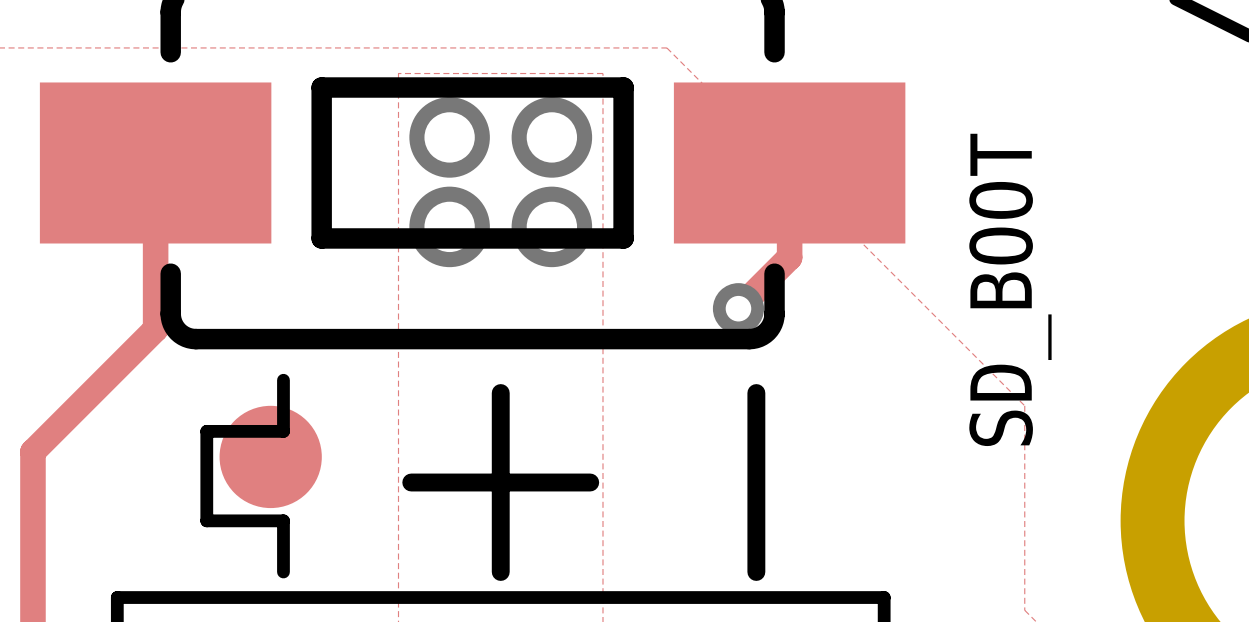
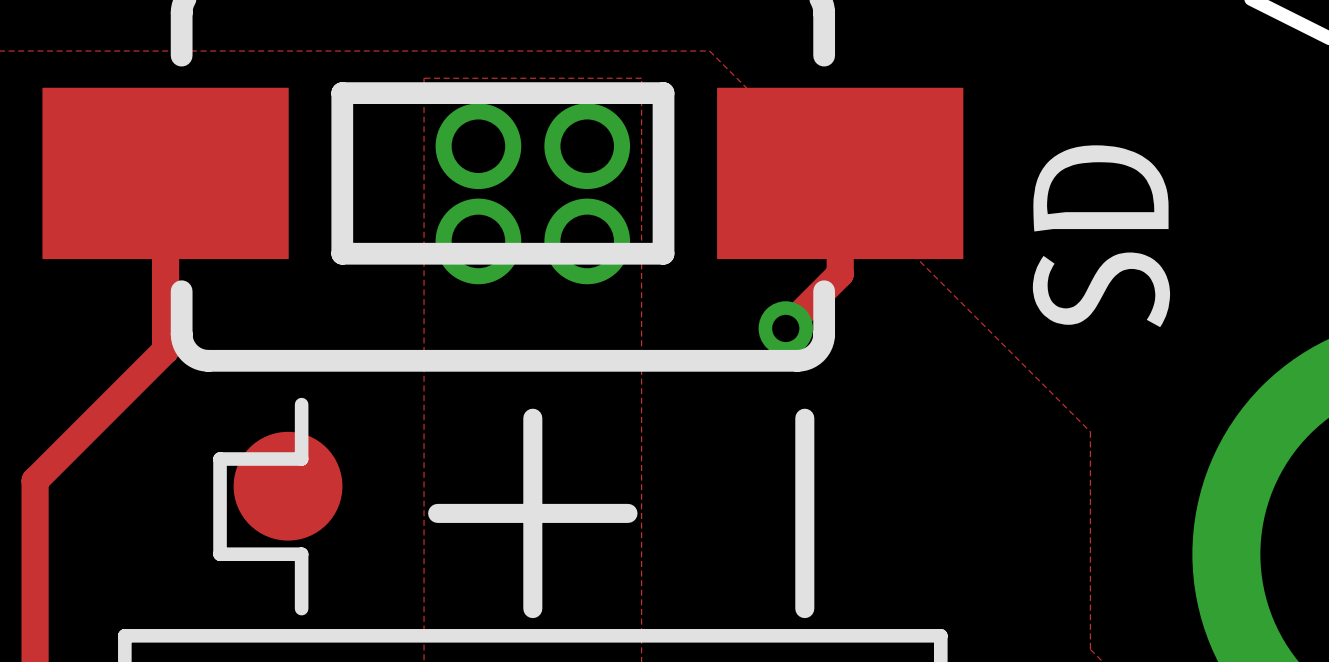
SD_BOOT name: SD_BOOT (1010, 289) -> SD (1101, 236)

